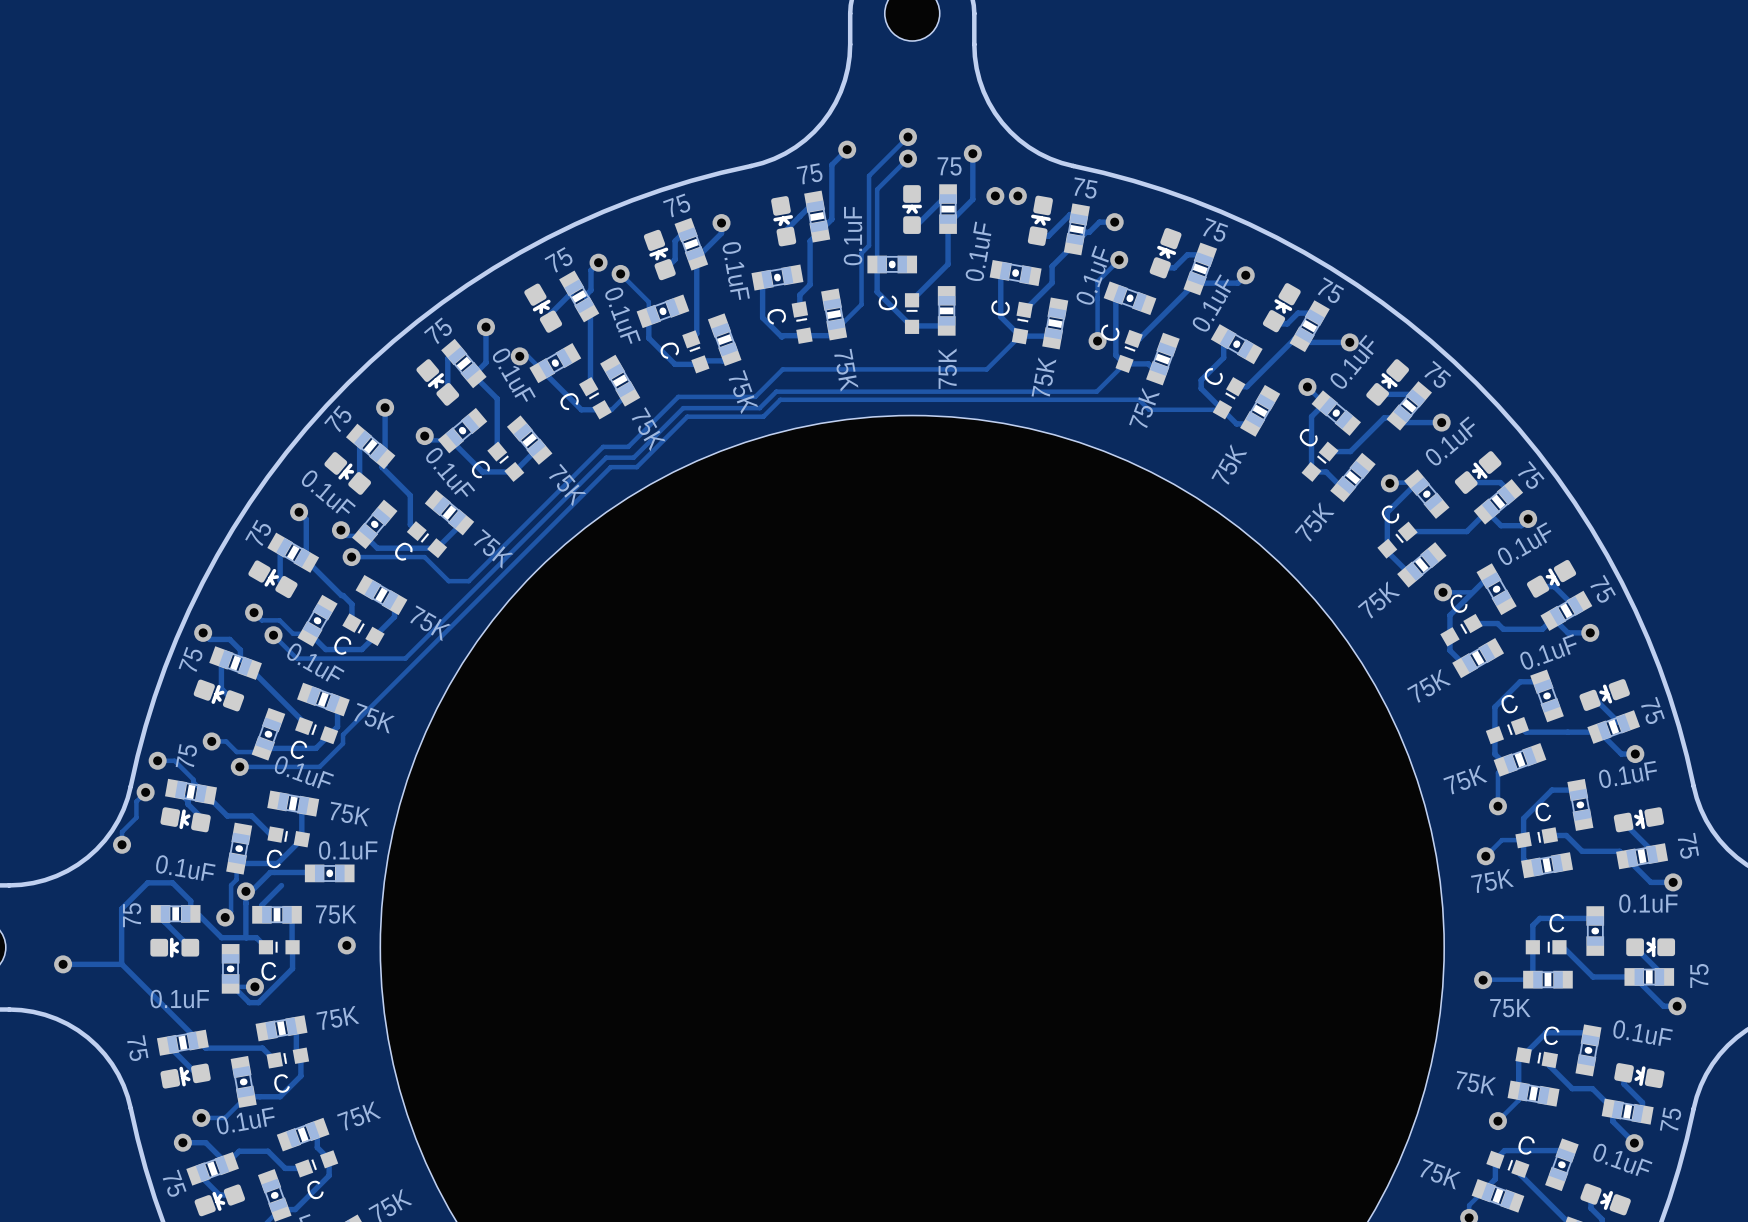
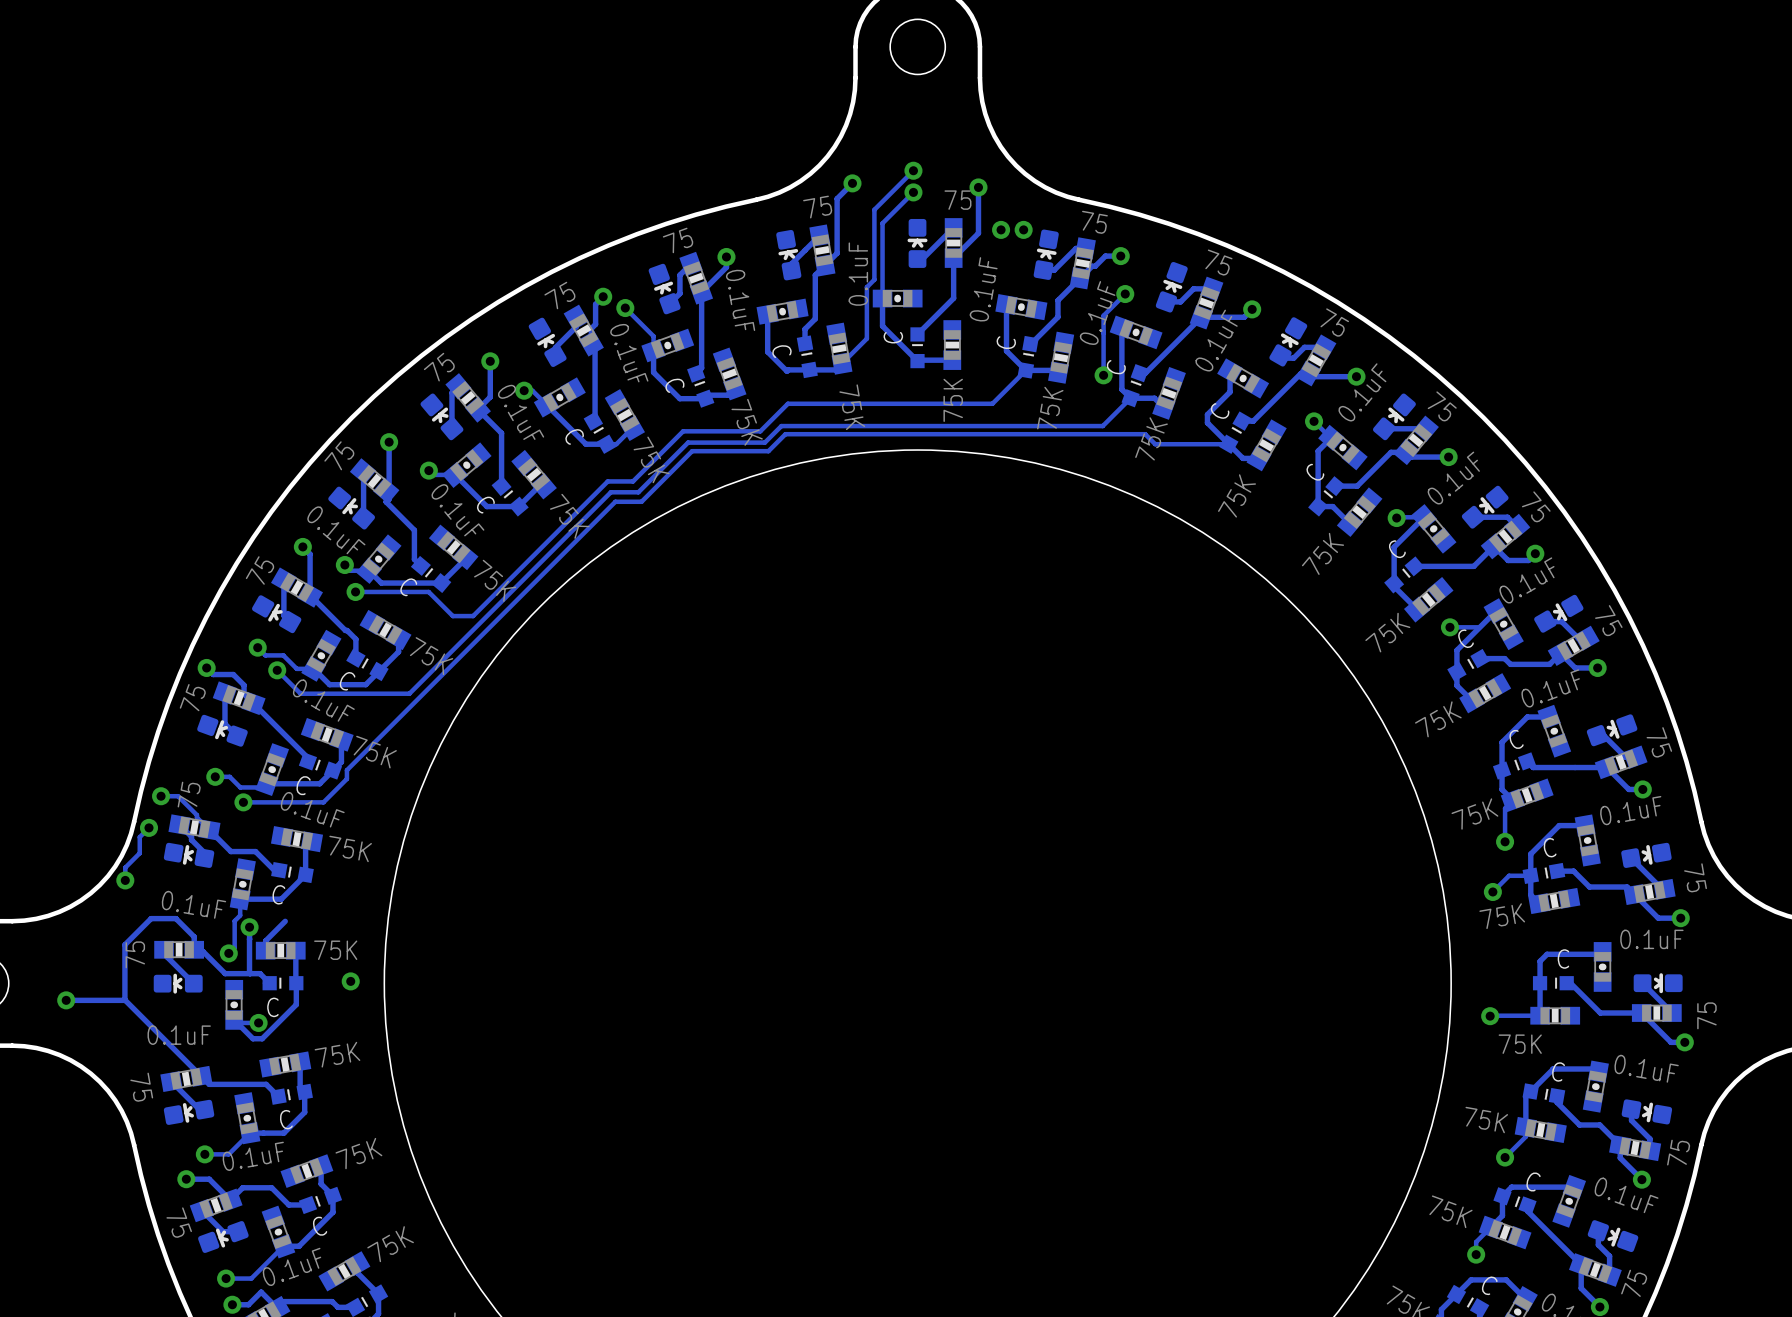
track: (314, 873) (270, 872) (251, 891) (245, 891) -> none
part: 0.1uF (329, 873) -> none

